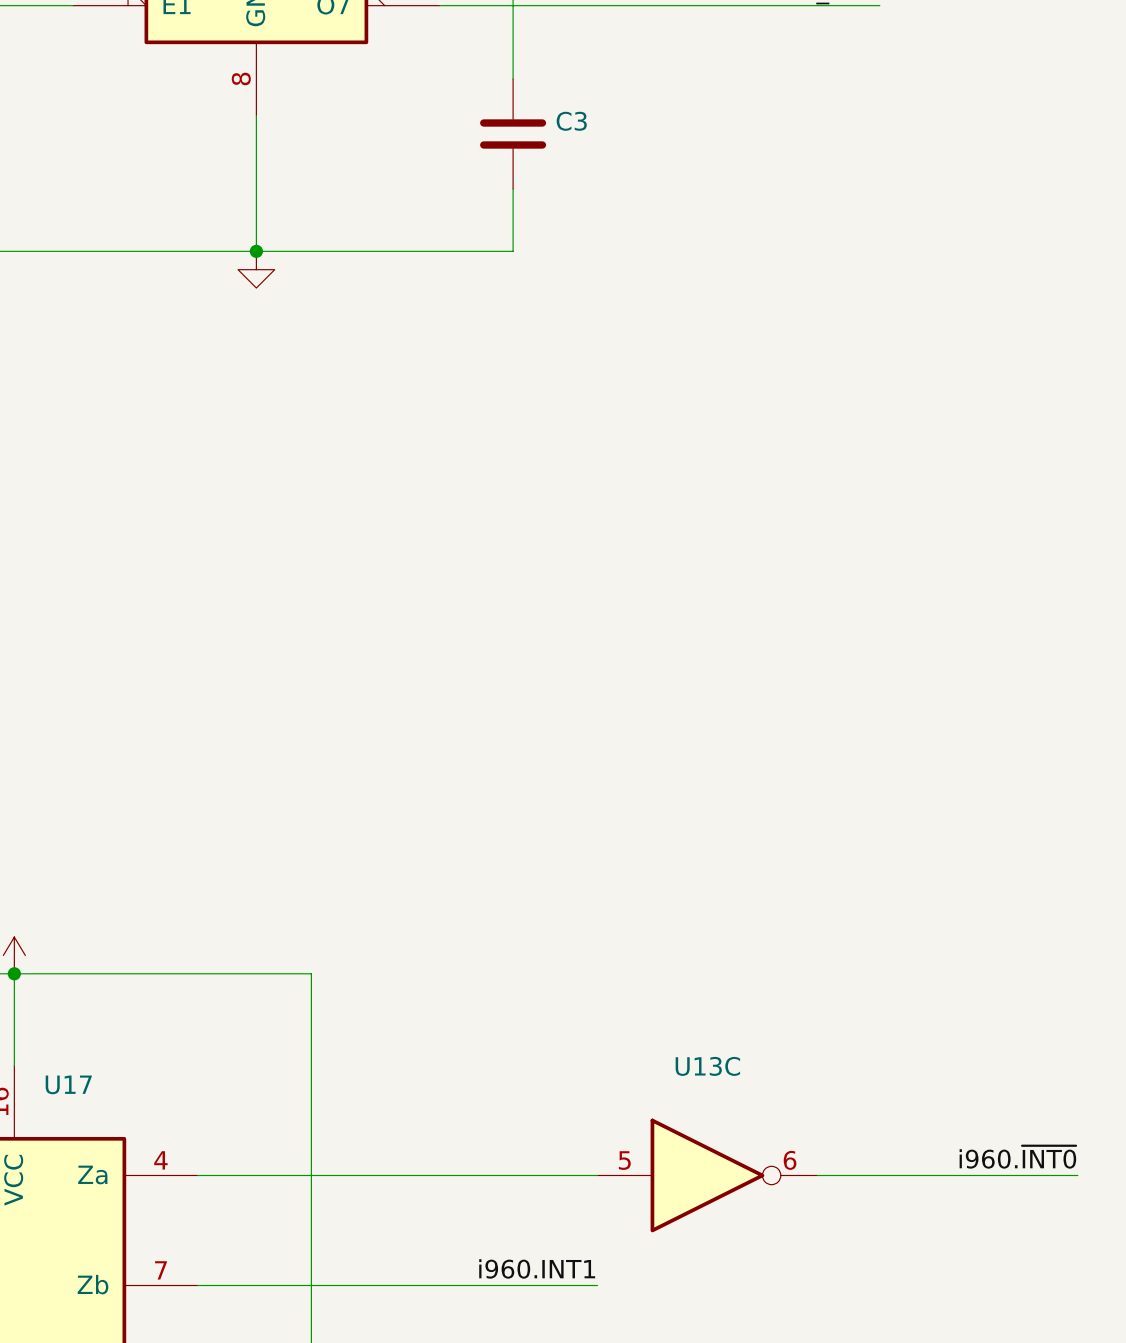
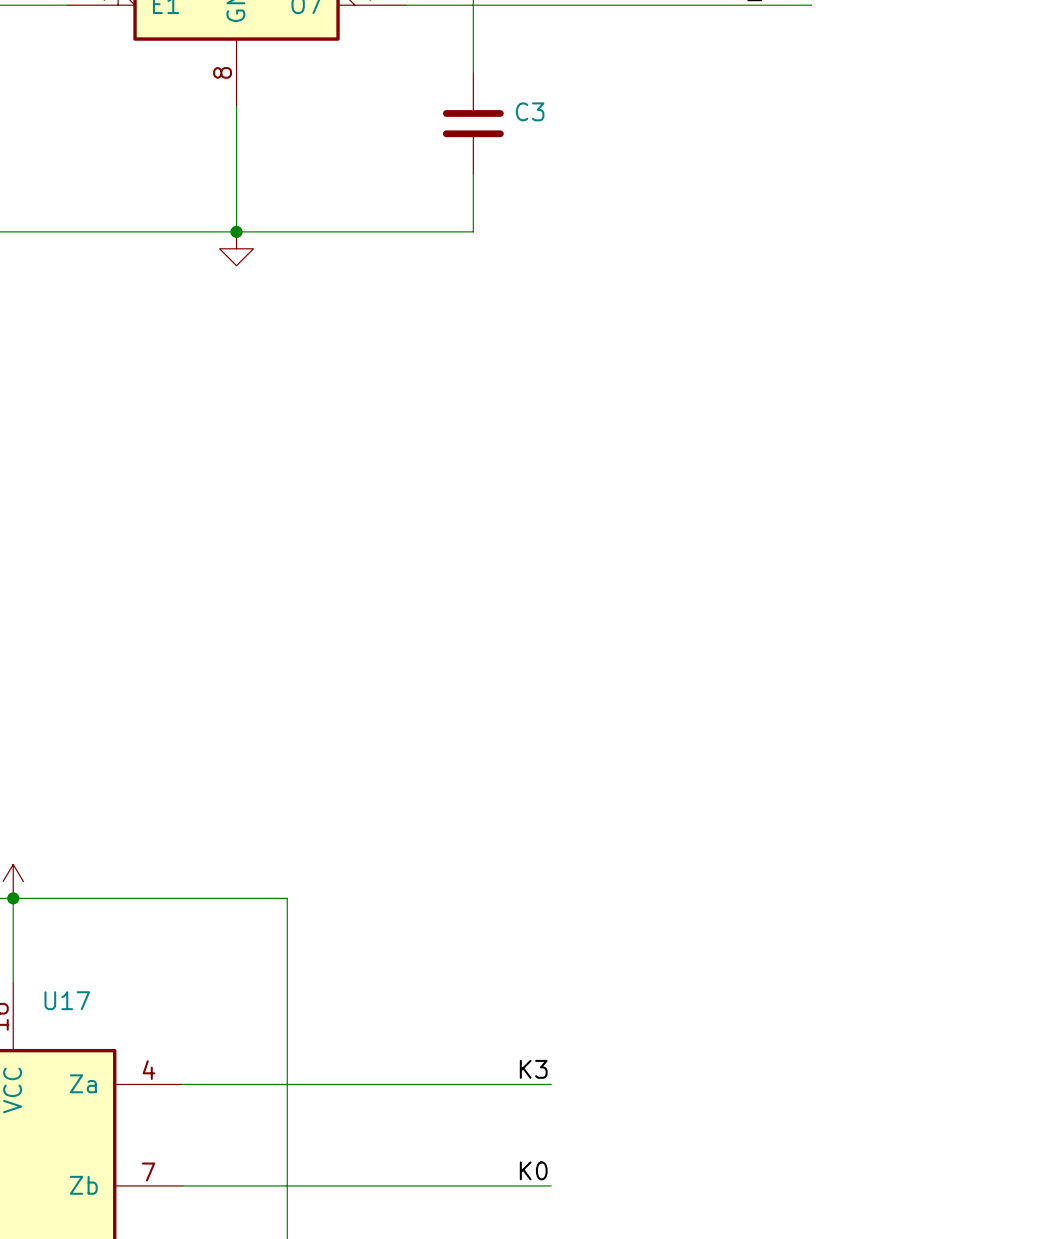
label: i960.~{INT0} (1017, 1157) -> none
label: none -> K3 (533, 1069)
U13C: (707, 1175) -> none
wire: (817, 1175) (1077, 1175) -> none
label: i960.INT1 (537, 1268) -> K0 (533, 1170)

